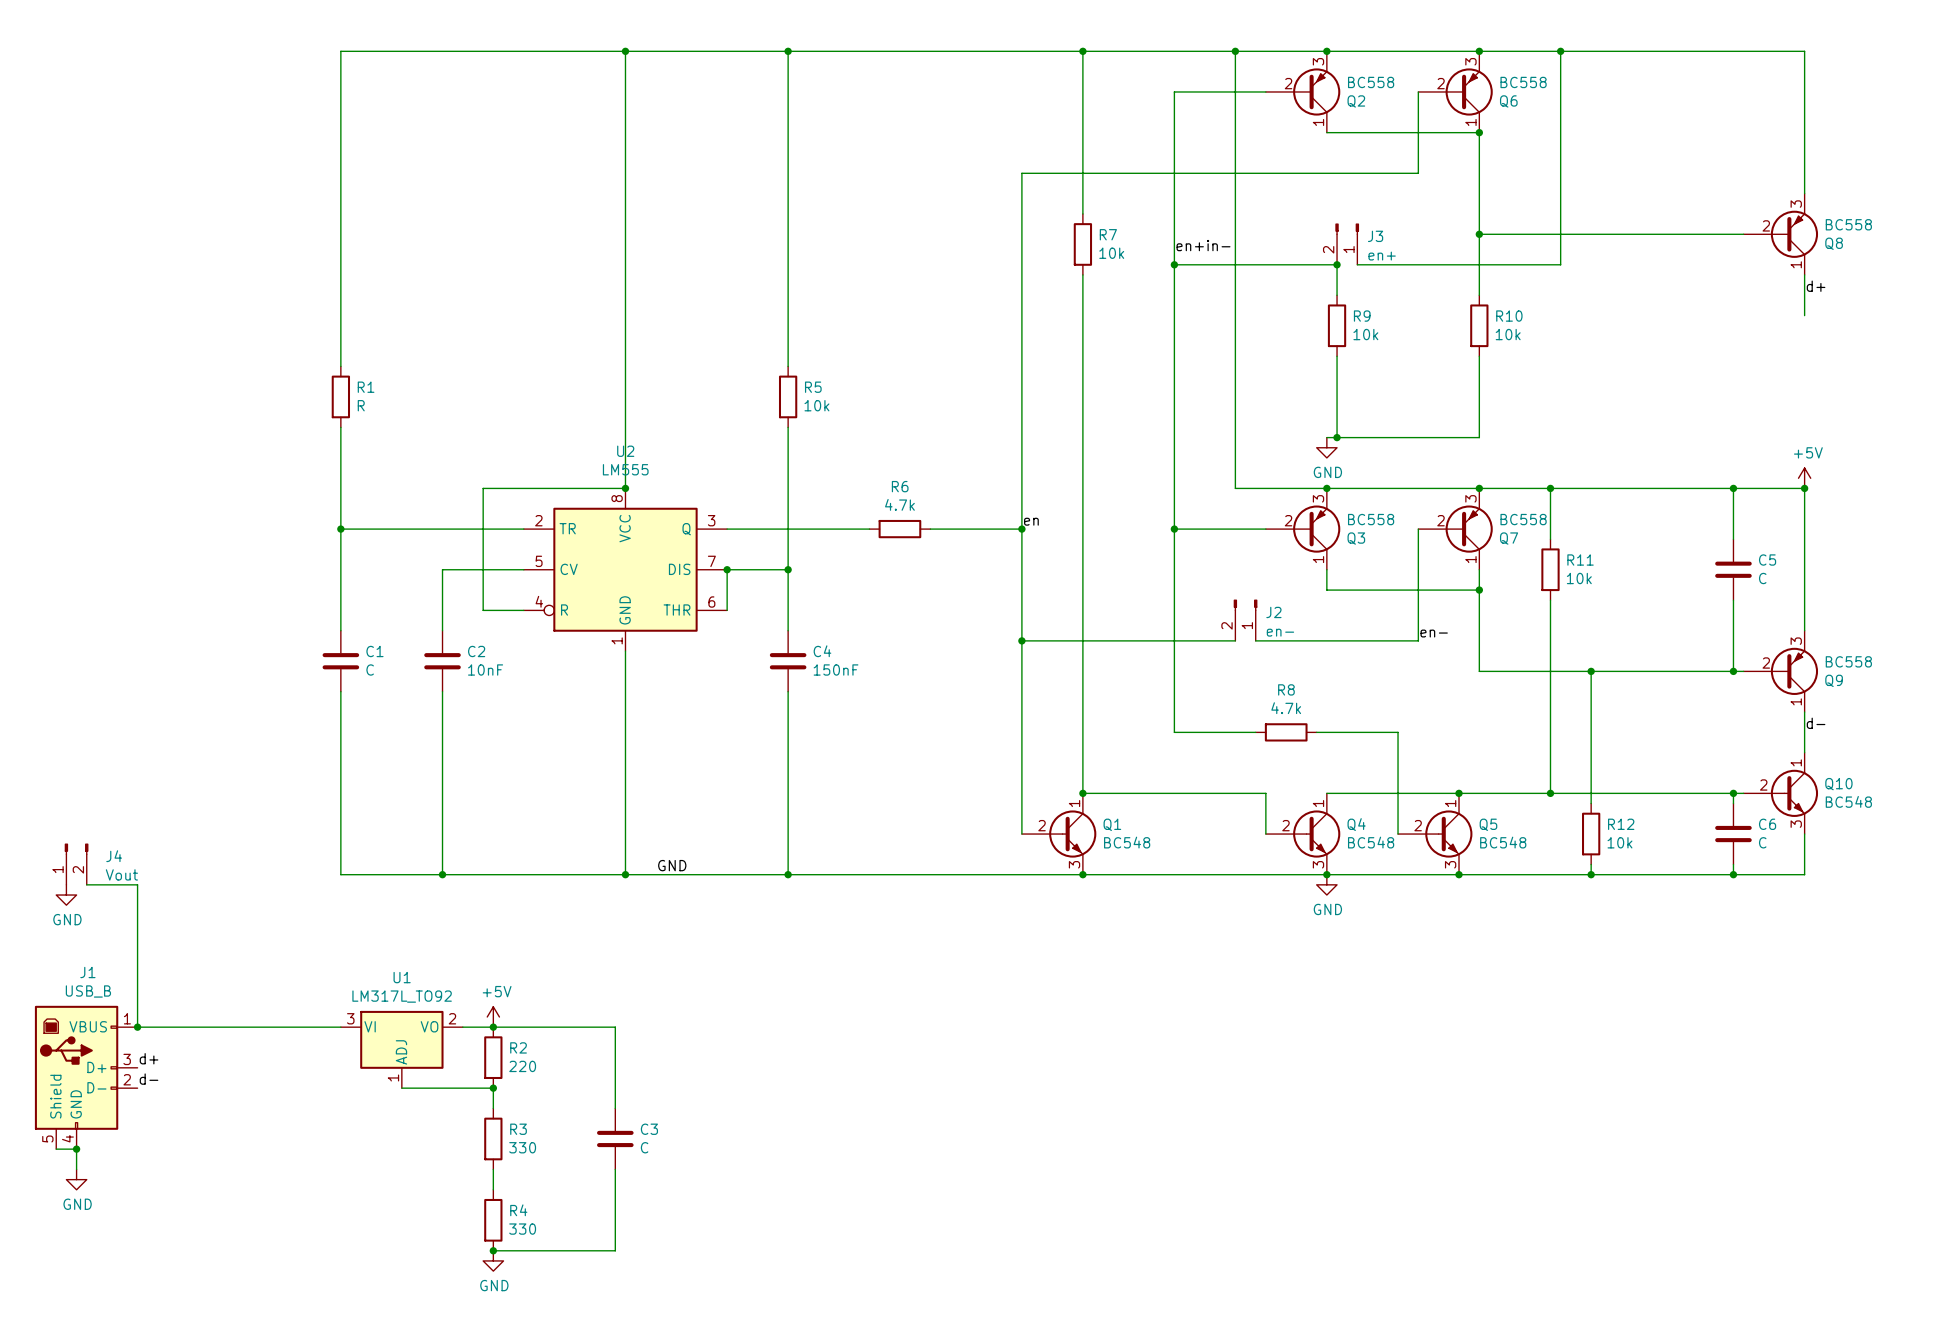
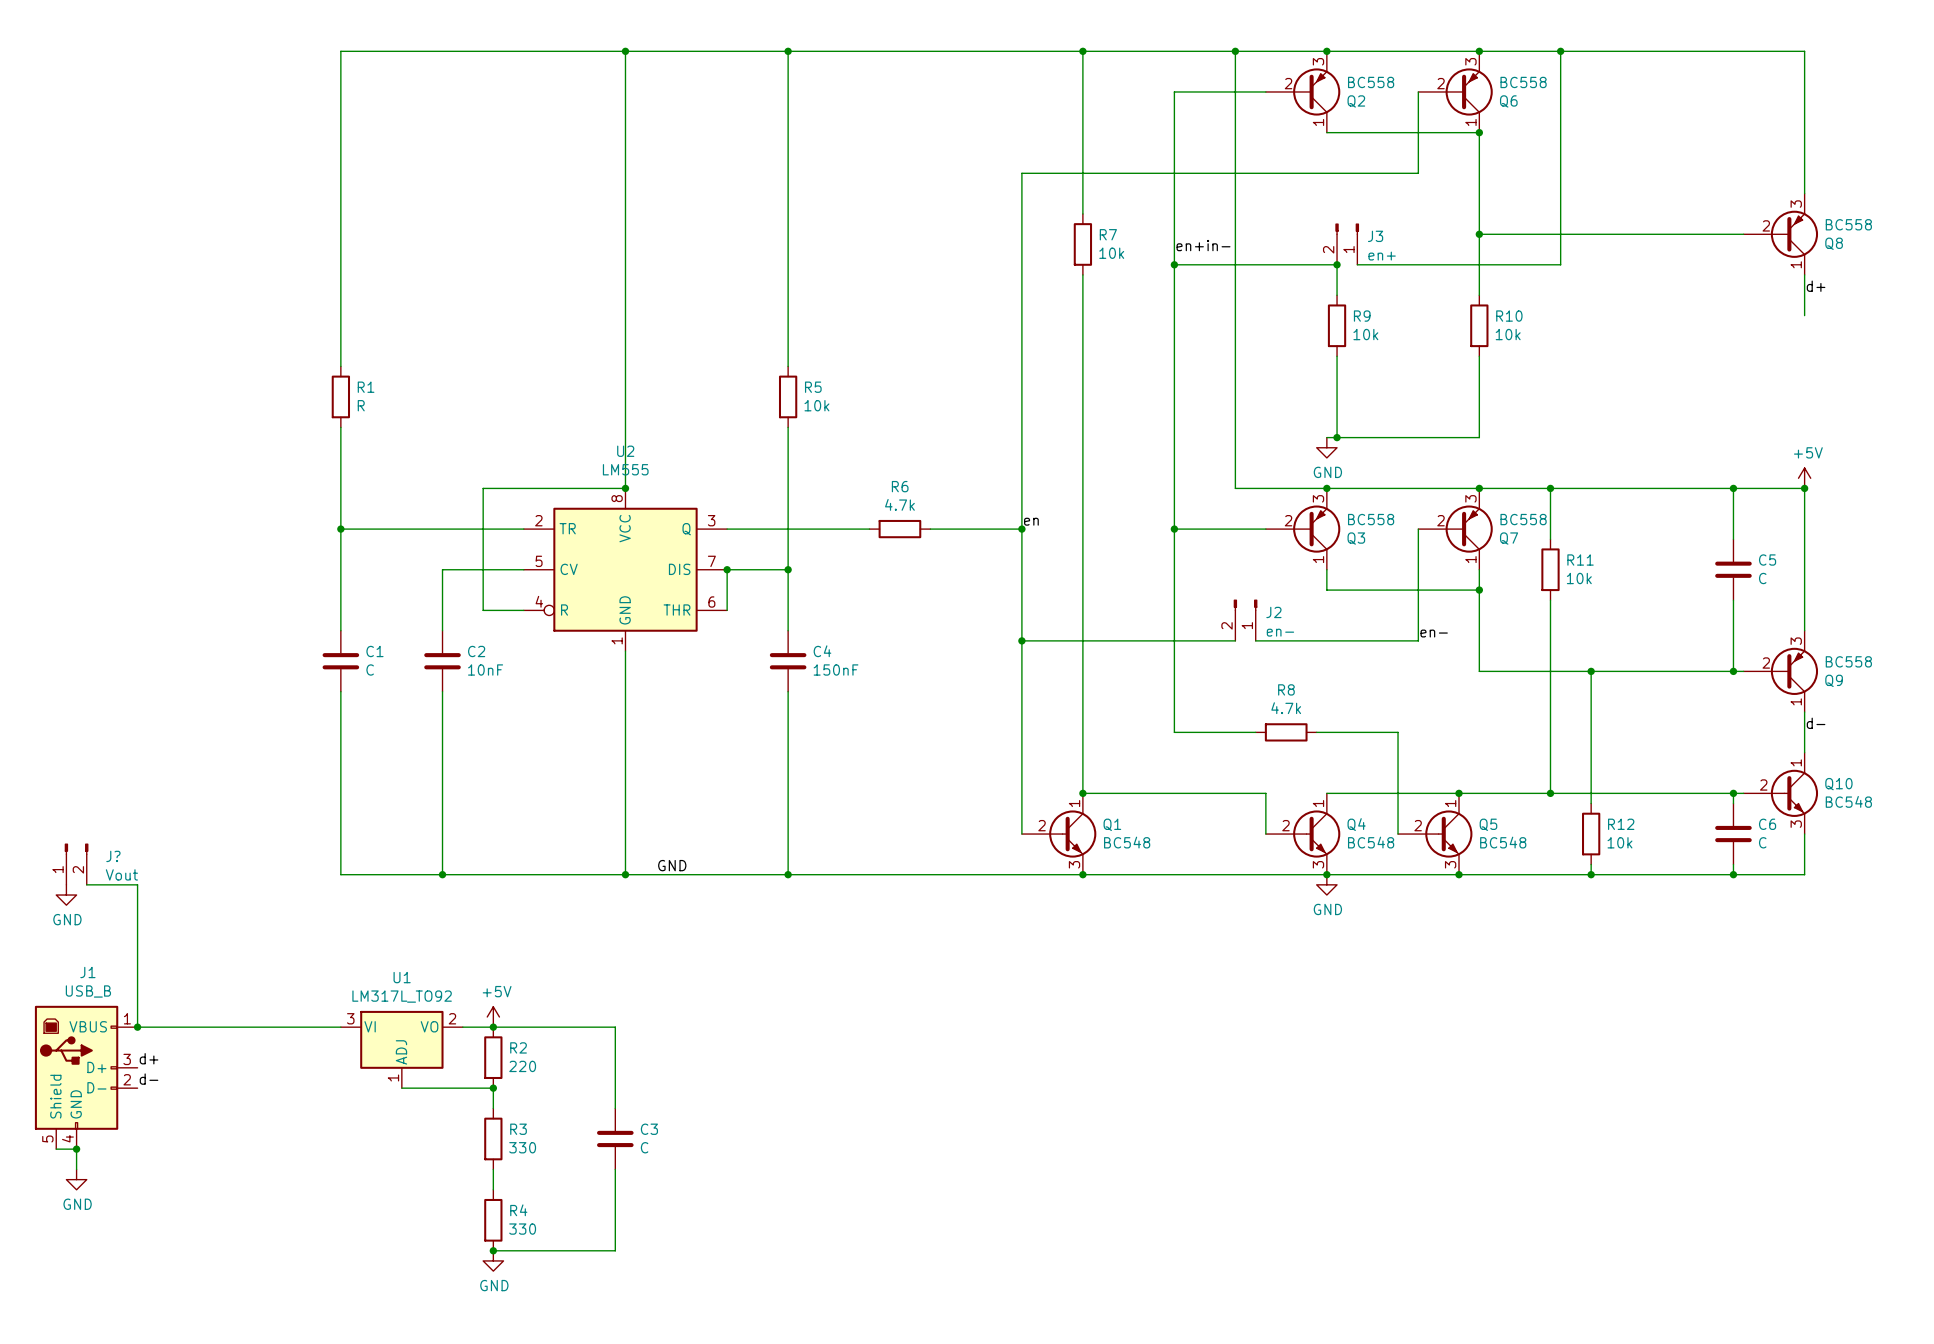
J4 name: J4 (114, 856) -> J? (113, 856)

